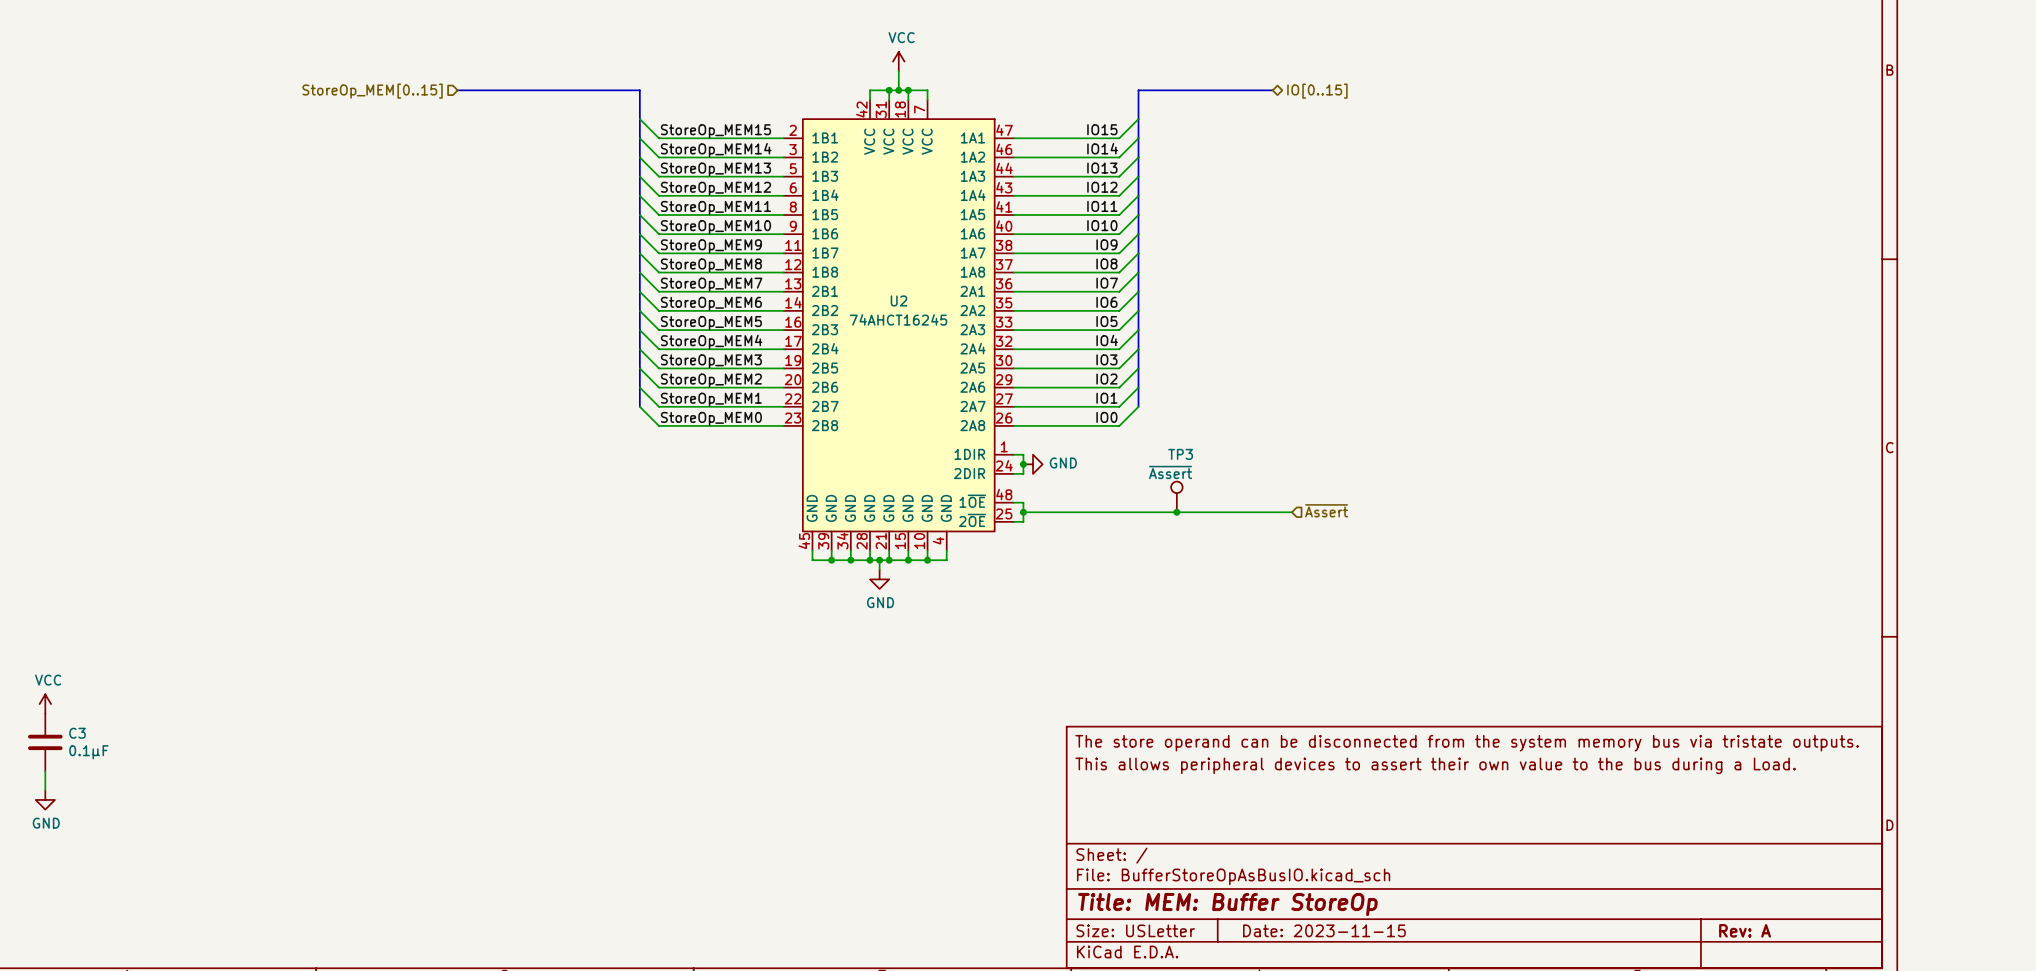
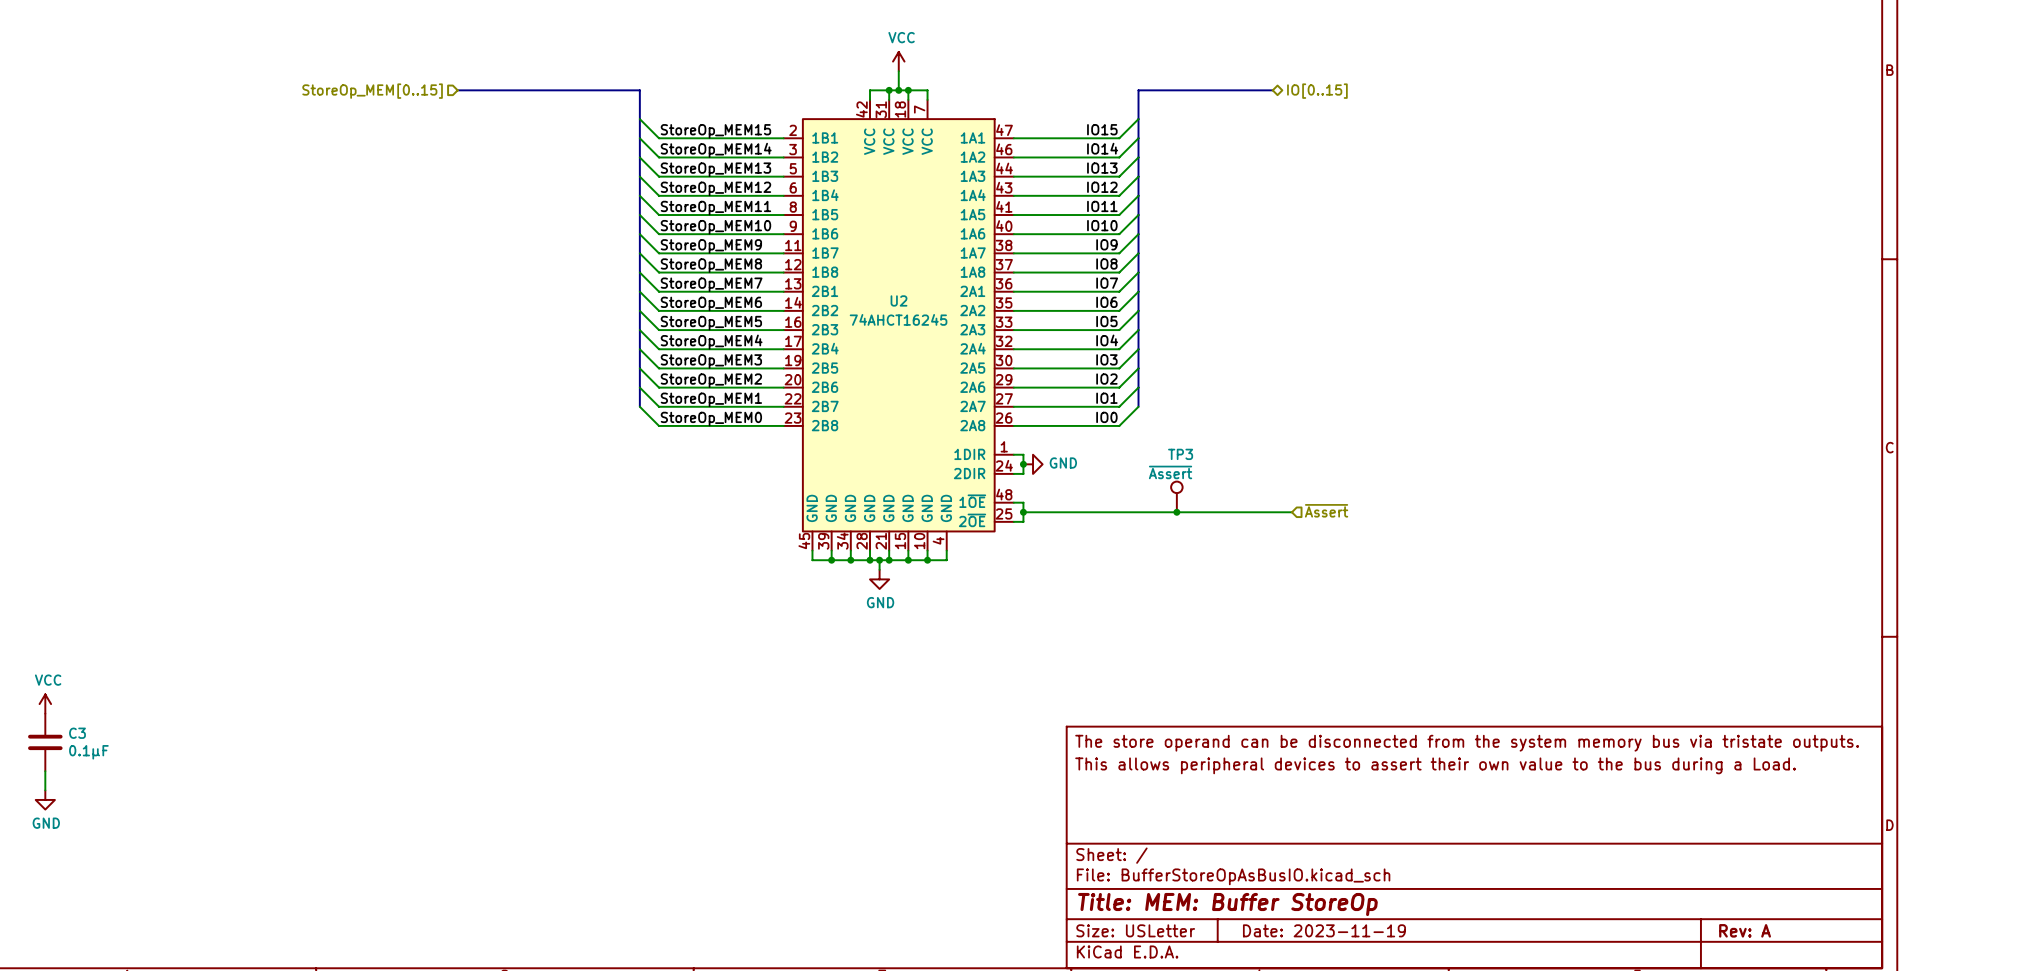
title block: Date: 2023-11-15 (1324, 930) -> Date: 2023-11-19 (1324, 930)

